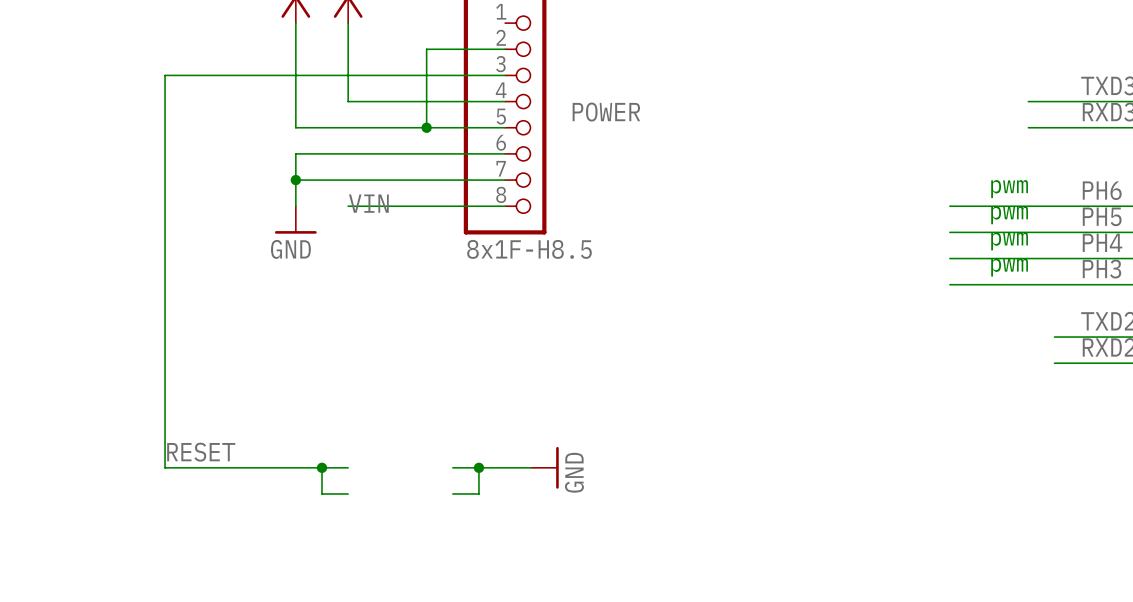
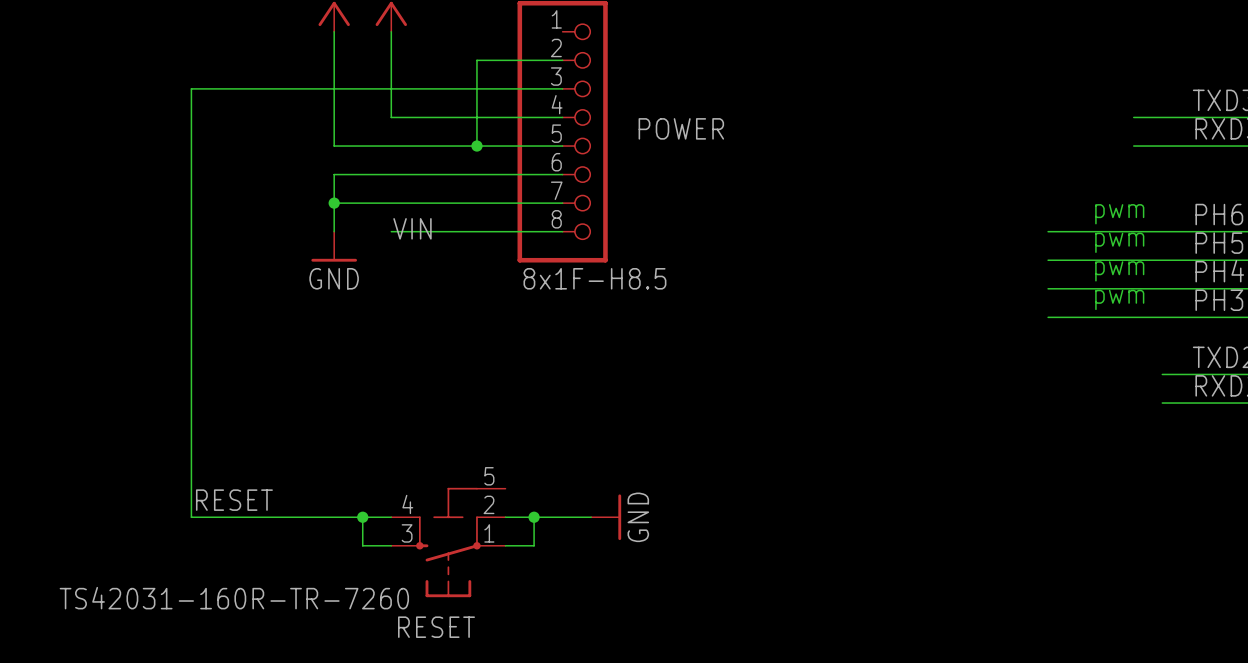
RESET: none -> TS42031-160R-TR-7260 (448, 542)

